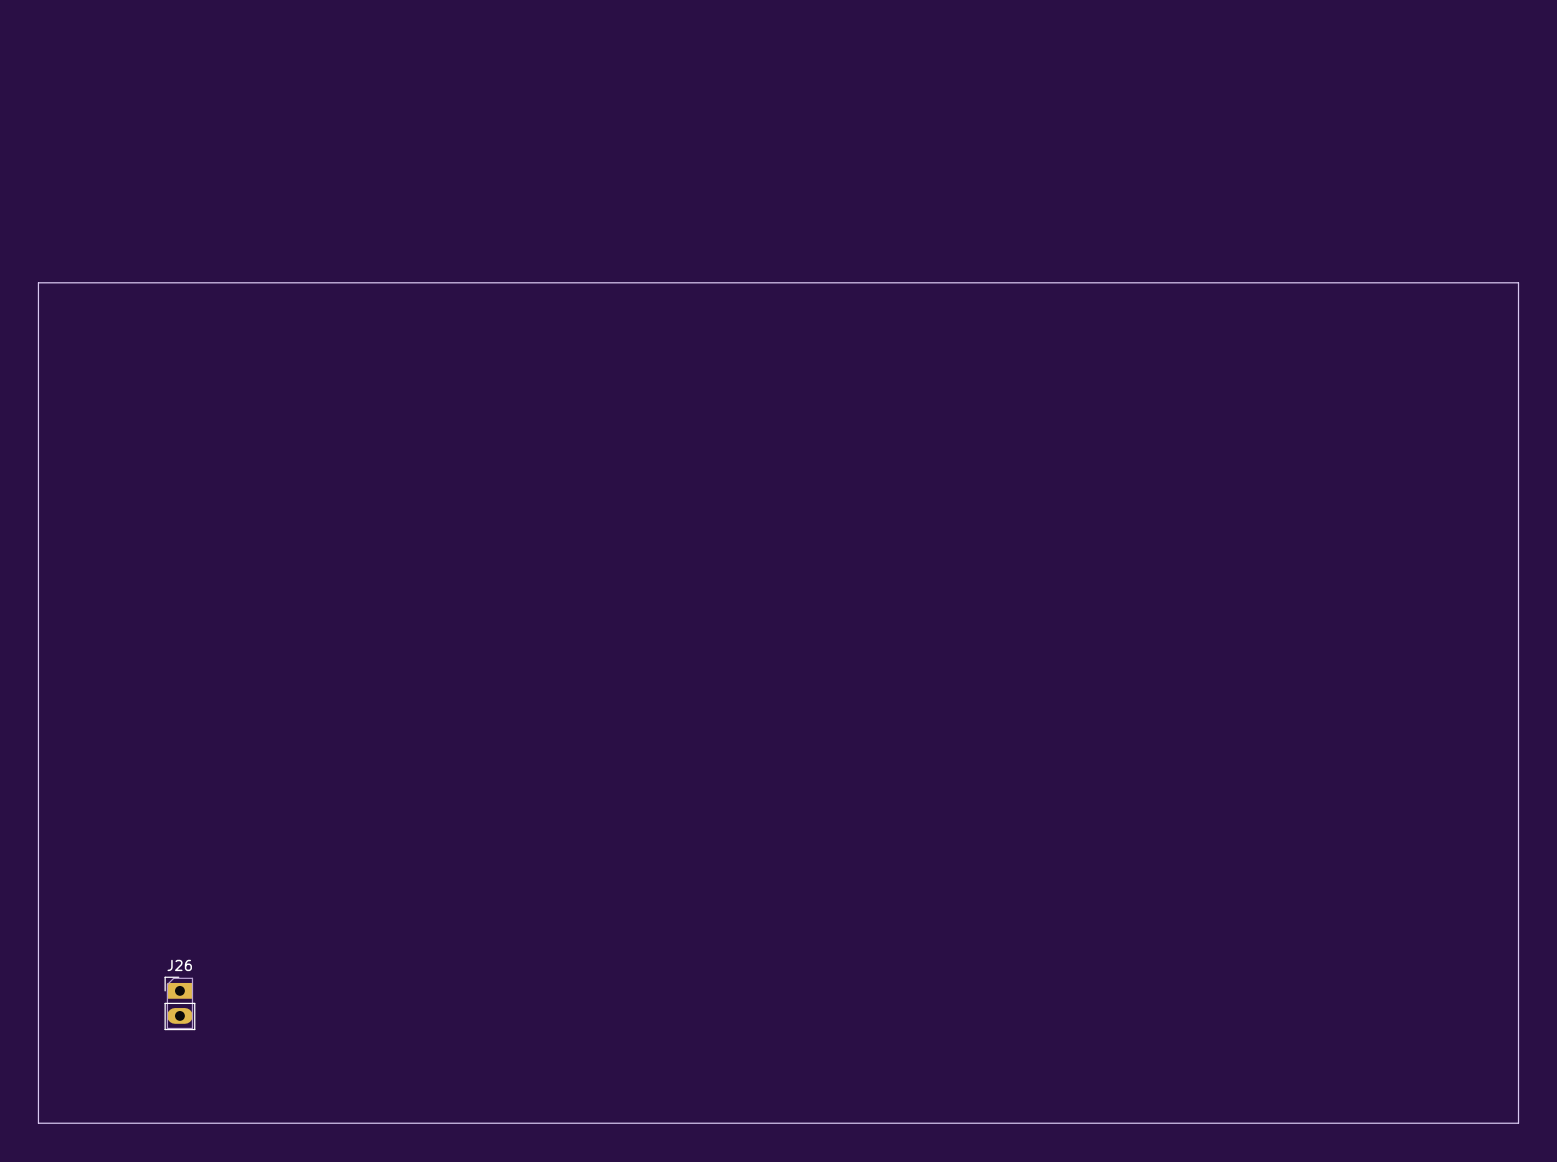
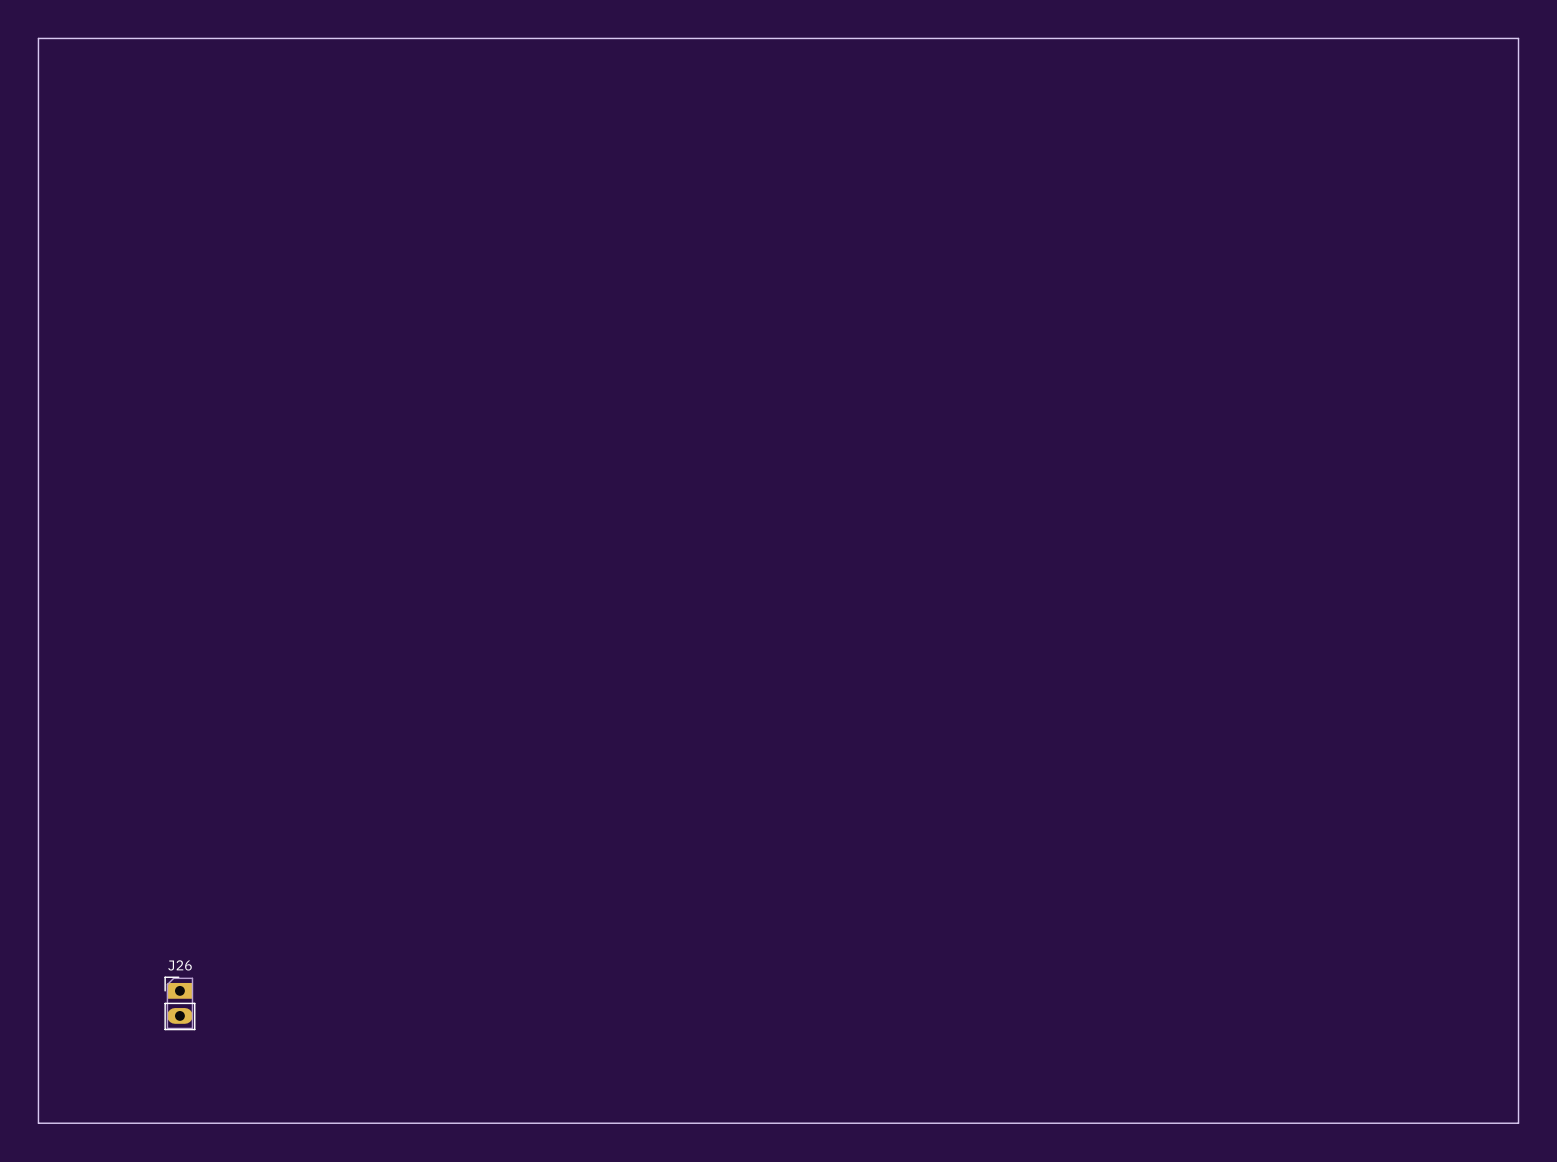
board edge: (38, 282) (1518, 282) -> (38, 282) (38, 38) (1518, 38) (1518, 282)

